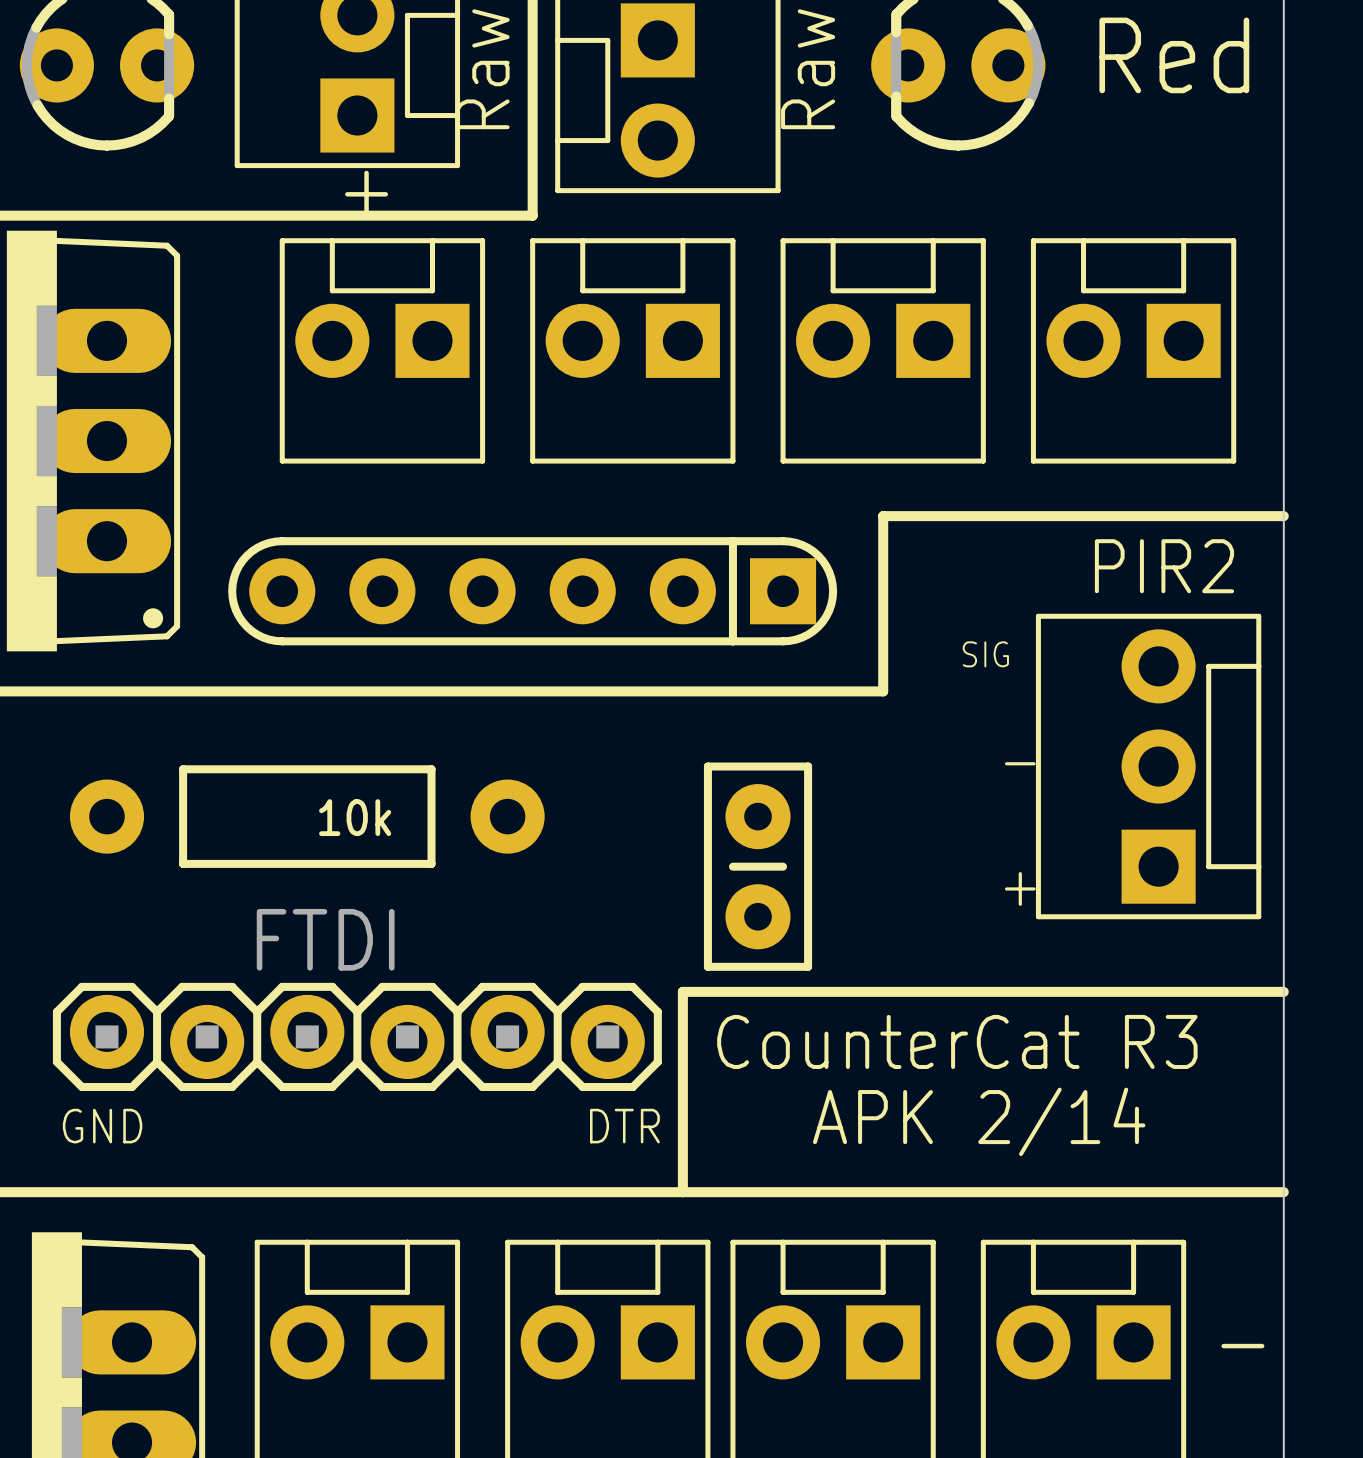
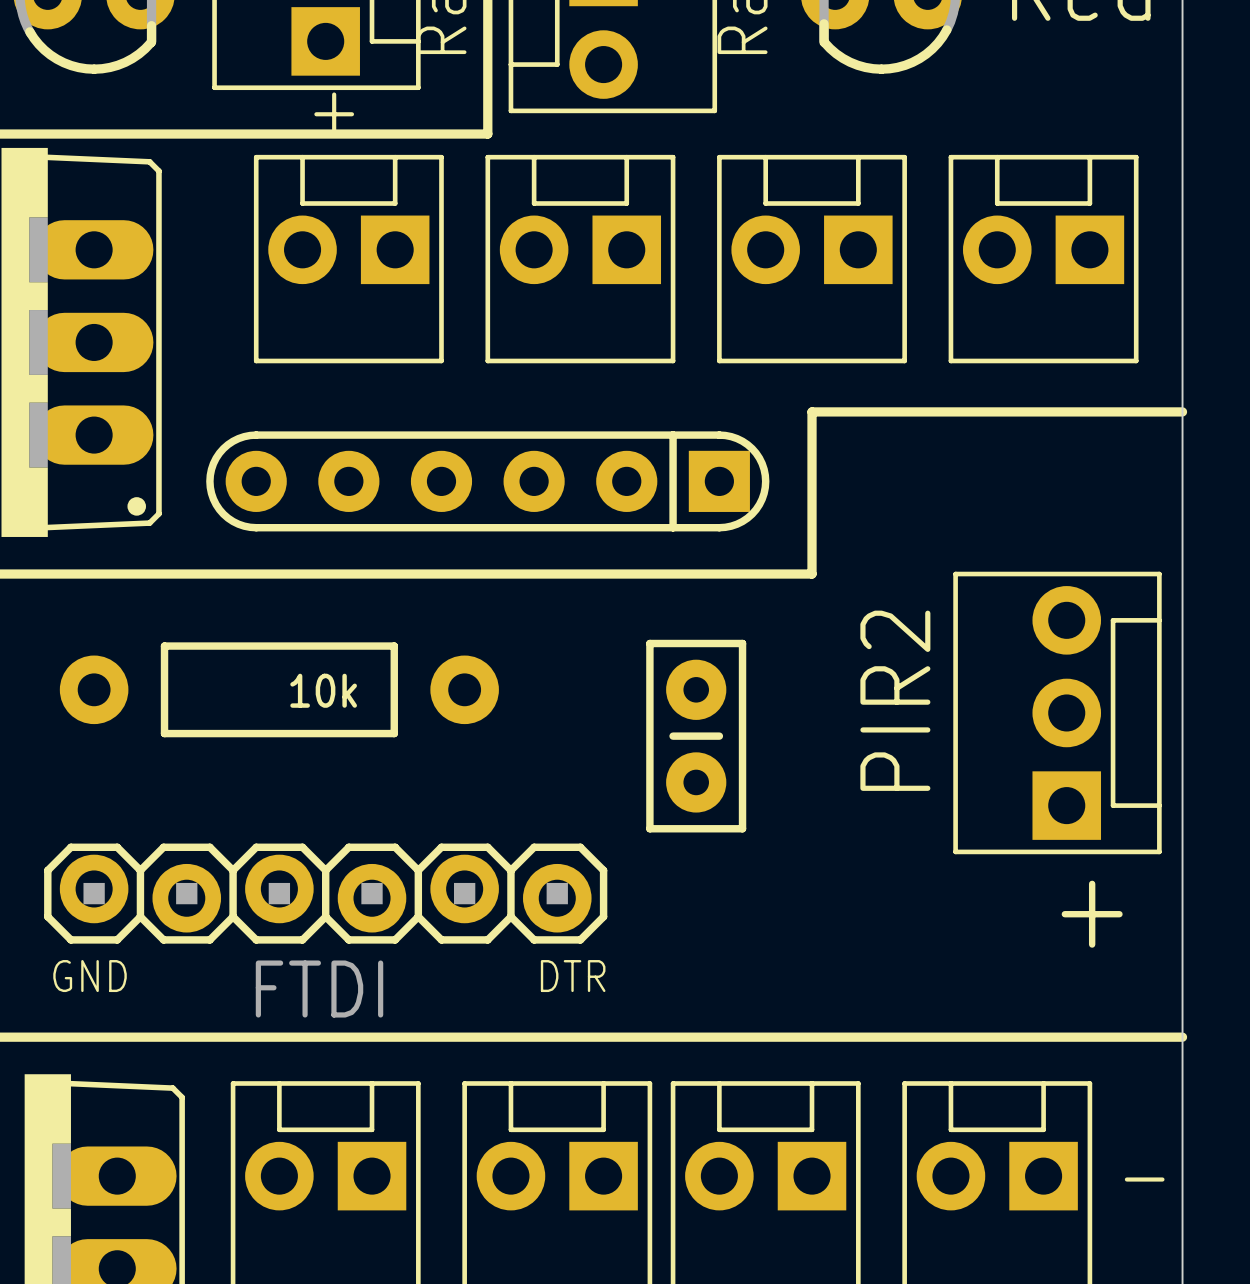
text: PIR2 (1164, 566) -> none
text: SIG (985, 654) -> none
text: - (1020, 763) -> none
part position: (1148, 766) -> (1057, 712)
text: + (1020, 888) -> PIR2 (895, 700)
part value position: FTDI (325, 939) -> FTDI (319, 989)
line: (1283, 991) (682, 991) (682, 1192) -> none
text: CounterCat R3 (957, 1041) -> none
text: none -> + (1092, 914)
text: APK 2/14 (979, 1121) -> none

